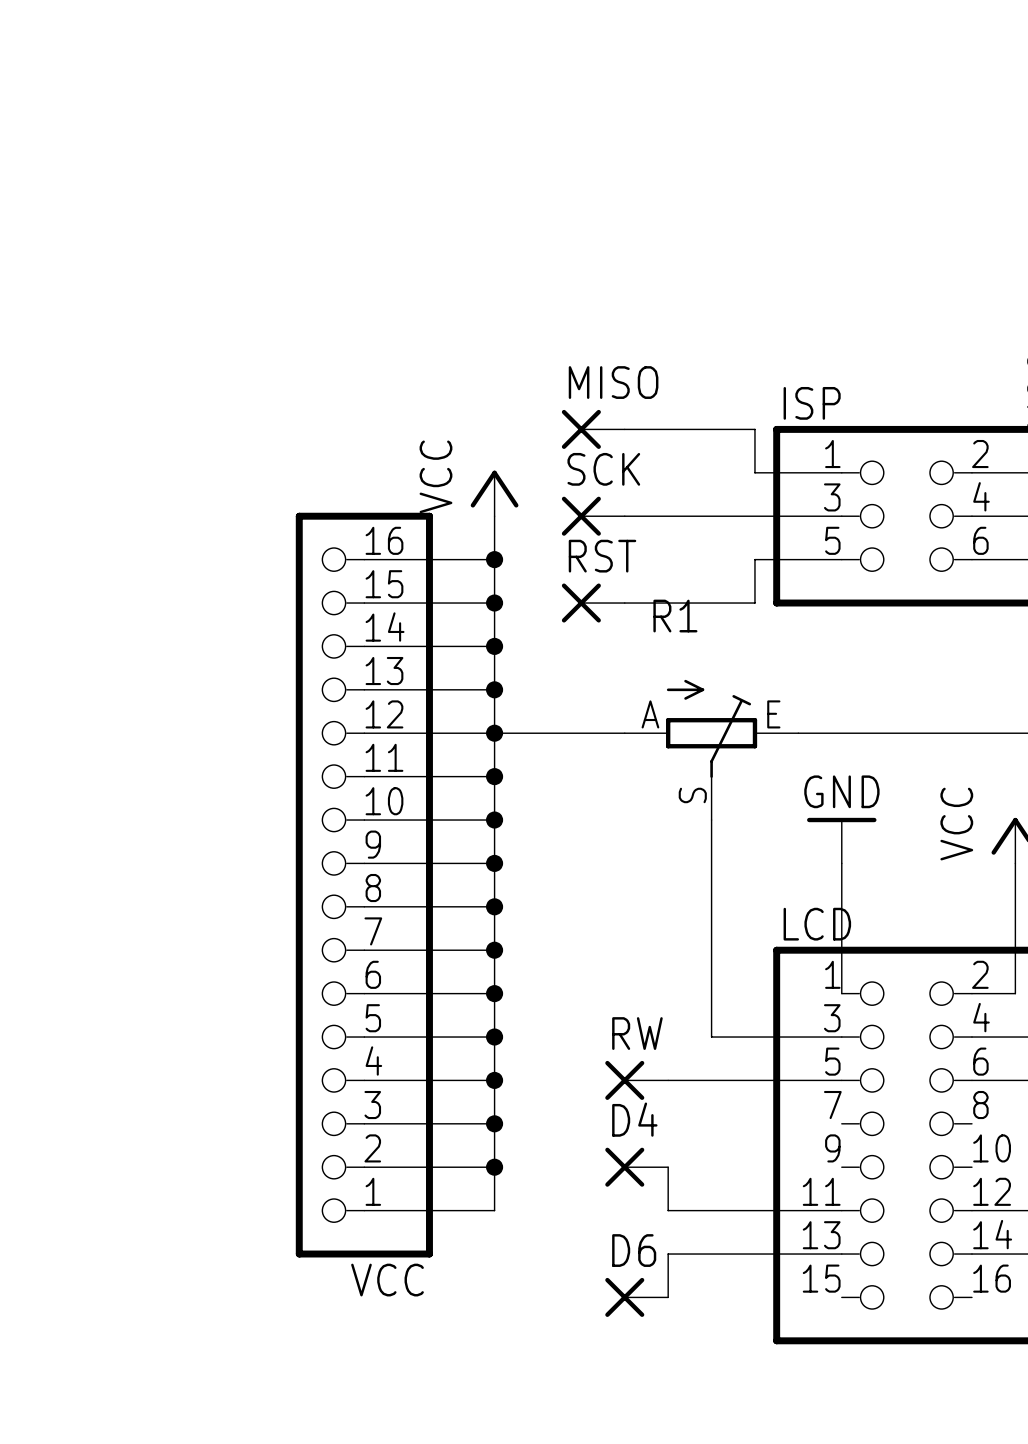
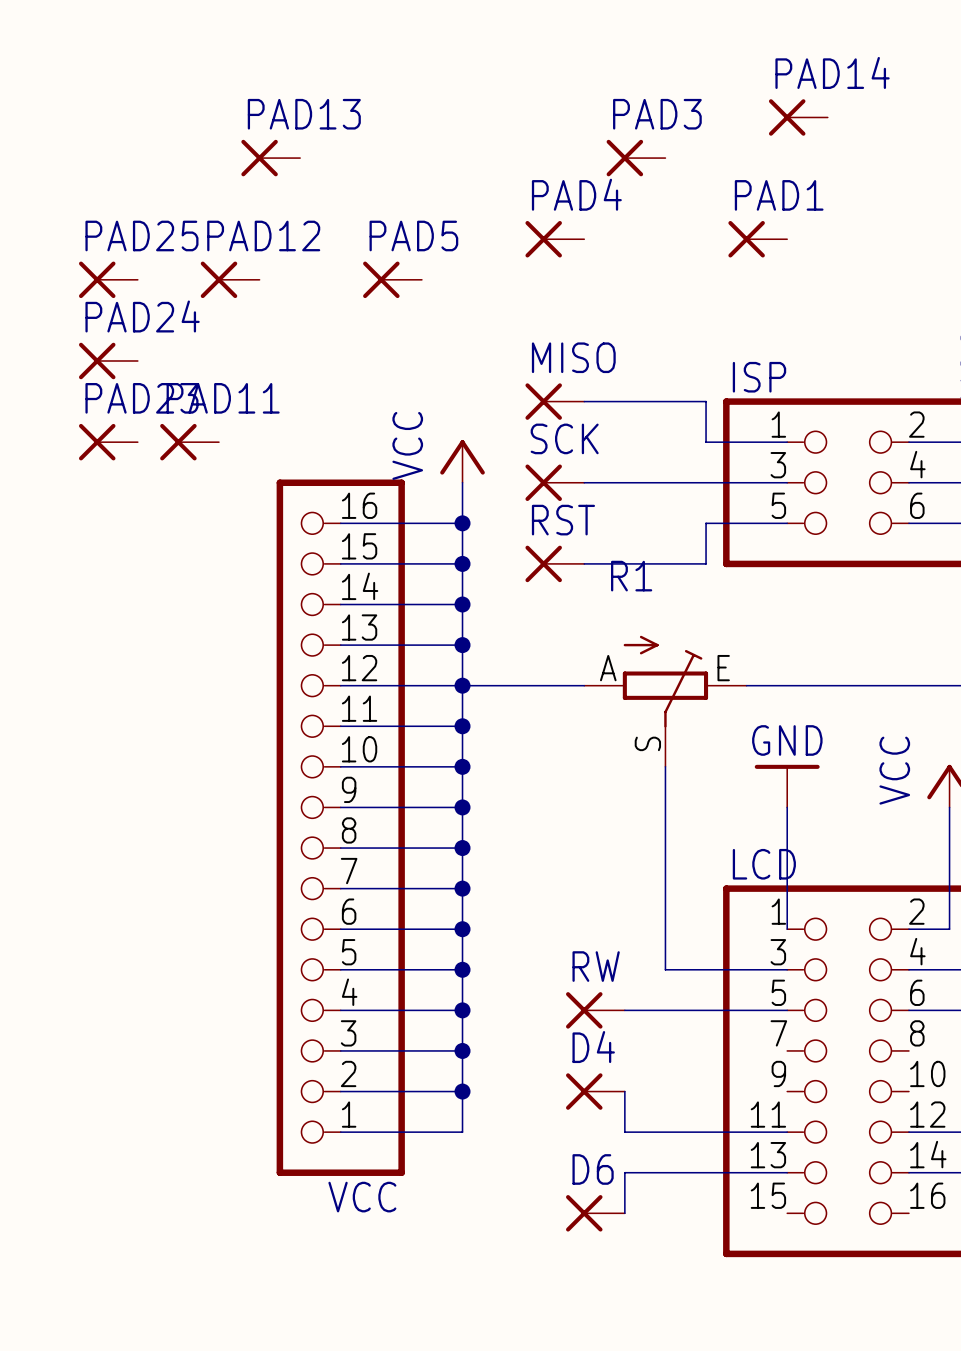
PAD14: none -> (798, 117)
PAD13: none -> (270, 158)
PAD3: none -> (636, 158)
PAD4: none -> (554, 239)
PAD1: none -> (757, 239)
PAD25: none -> (108, 279)
PAD12: none -> (230, 279)
PAD5: none -> (392, 279)
PAD24: none -> (108, 360)
PAD23: none -> (108, 442)
PAD11: none -> (189, 442)

